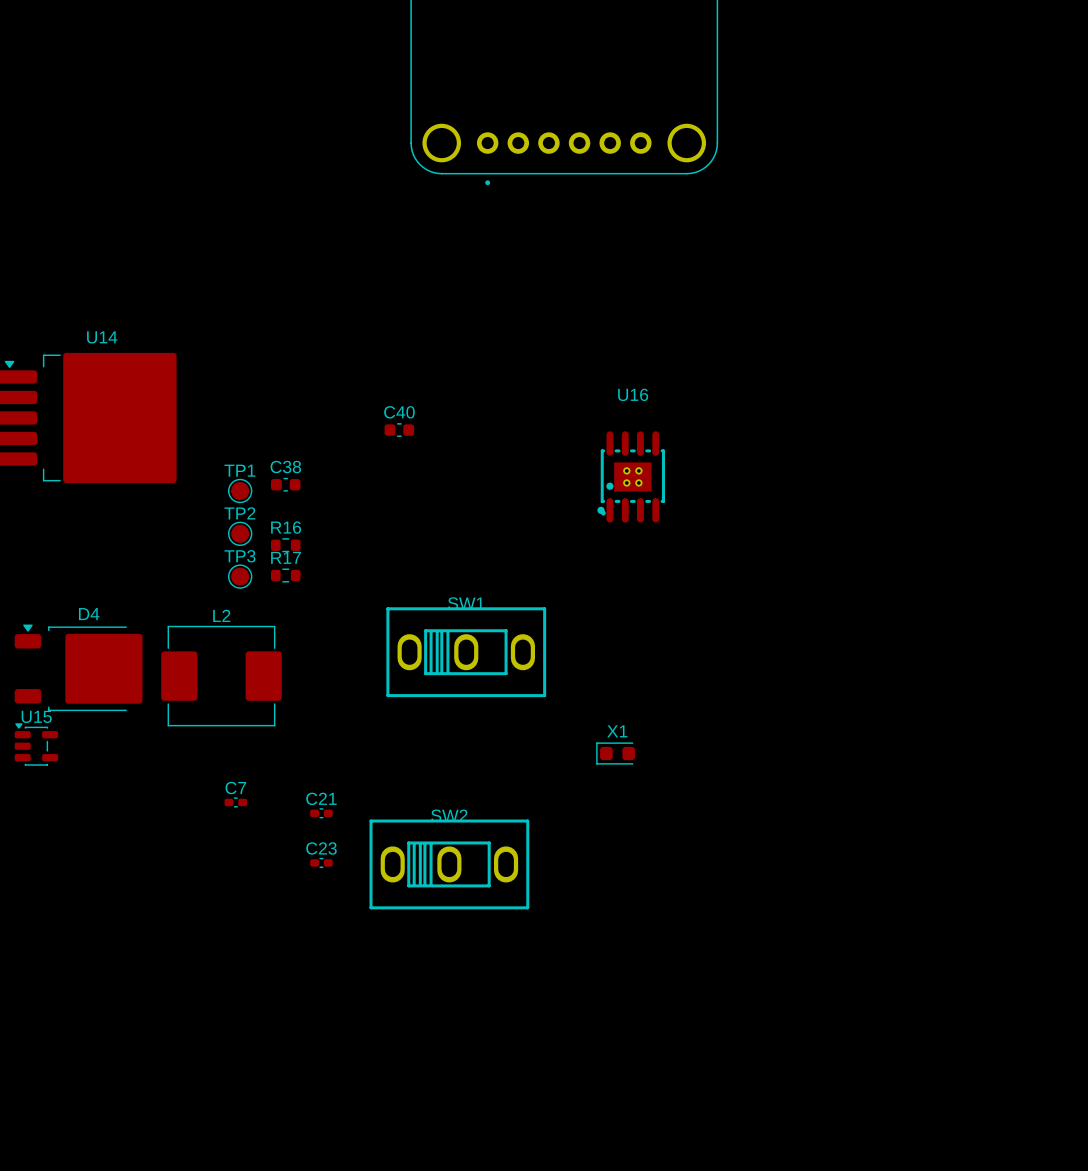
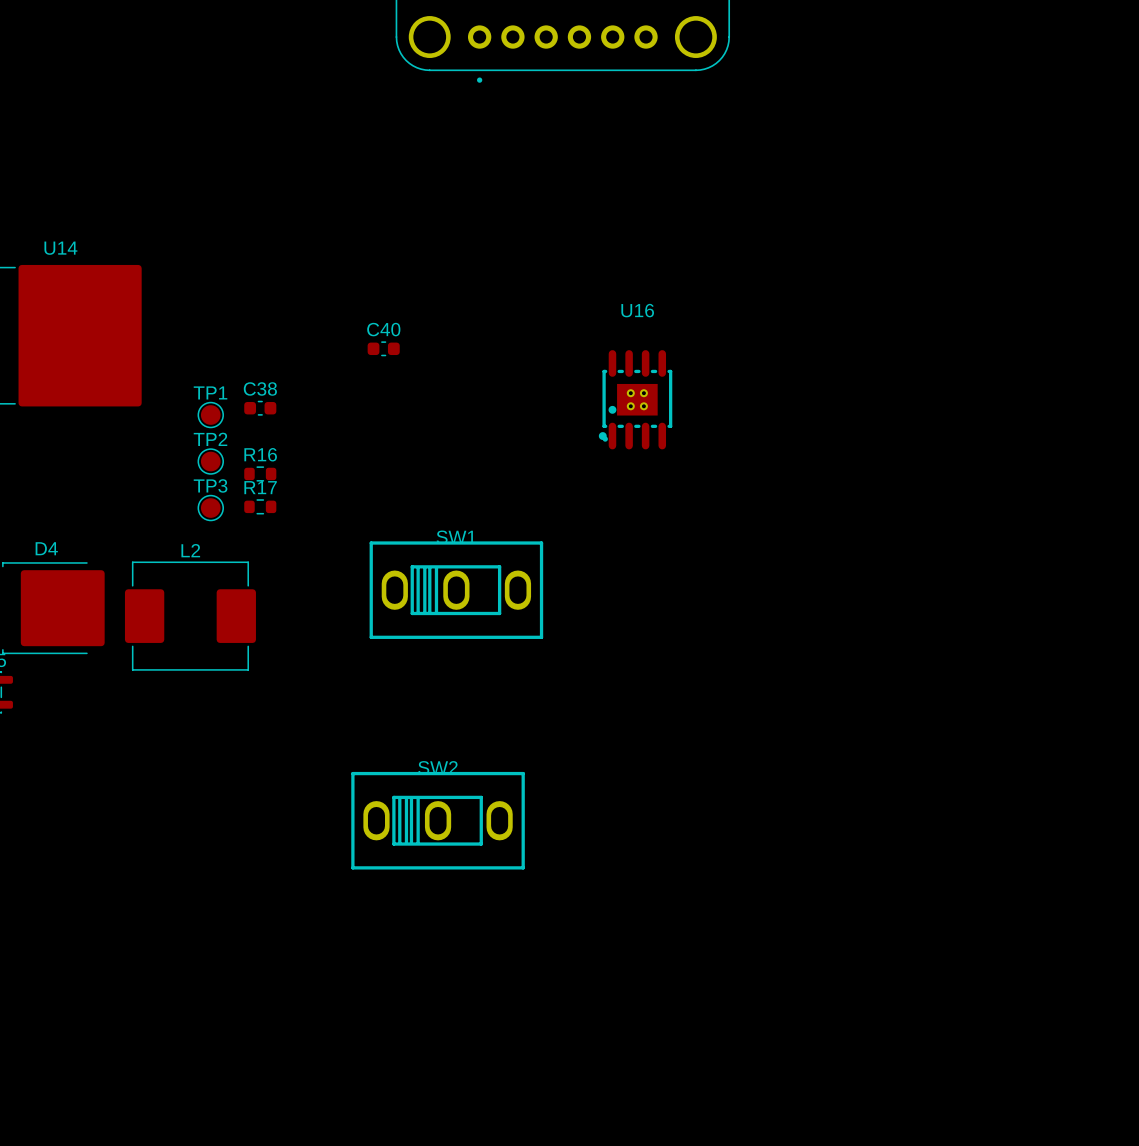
X1: (615, 753) -> none
C7: (235, 802) -> none
C21: (321, 813) -> none
C23: (321, 862) -> none

